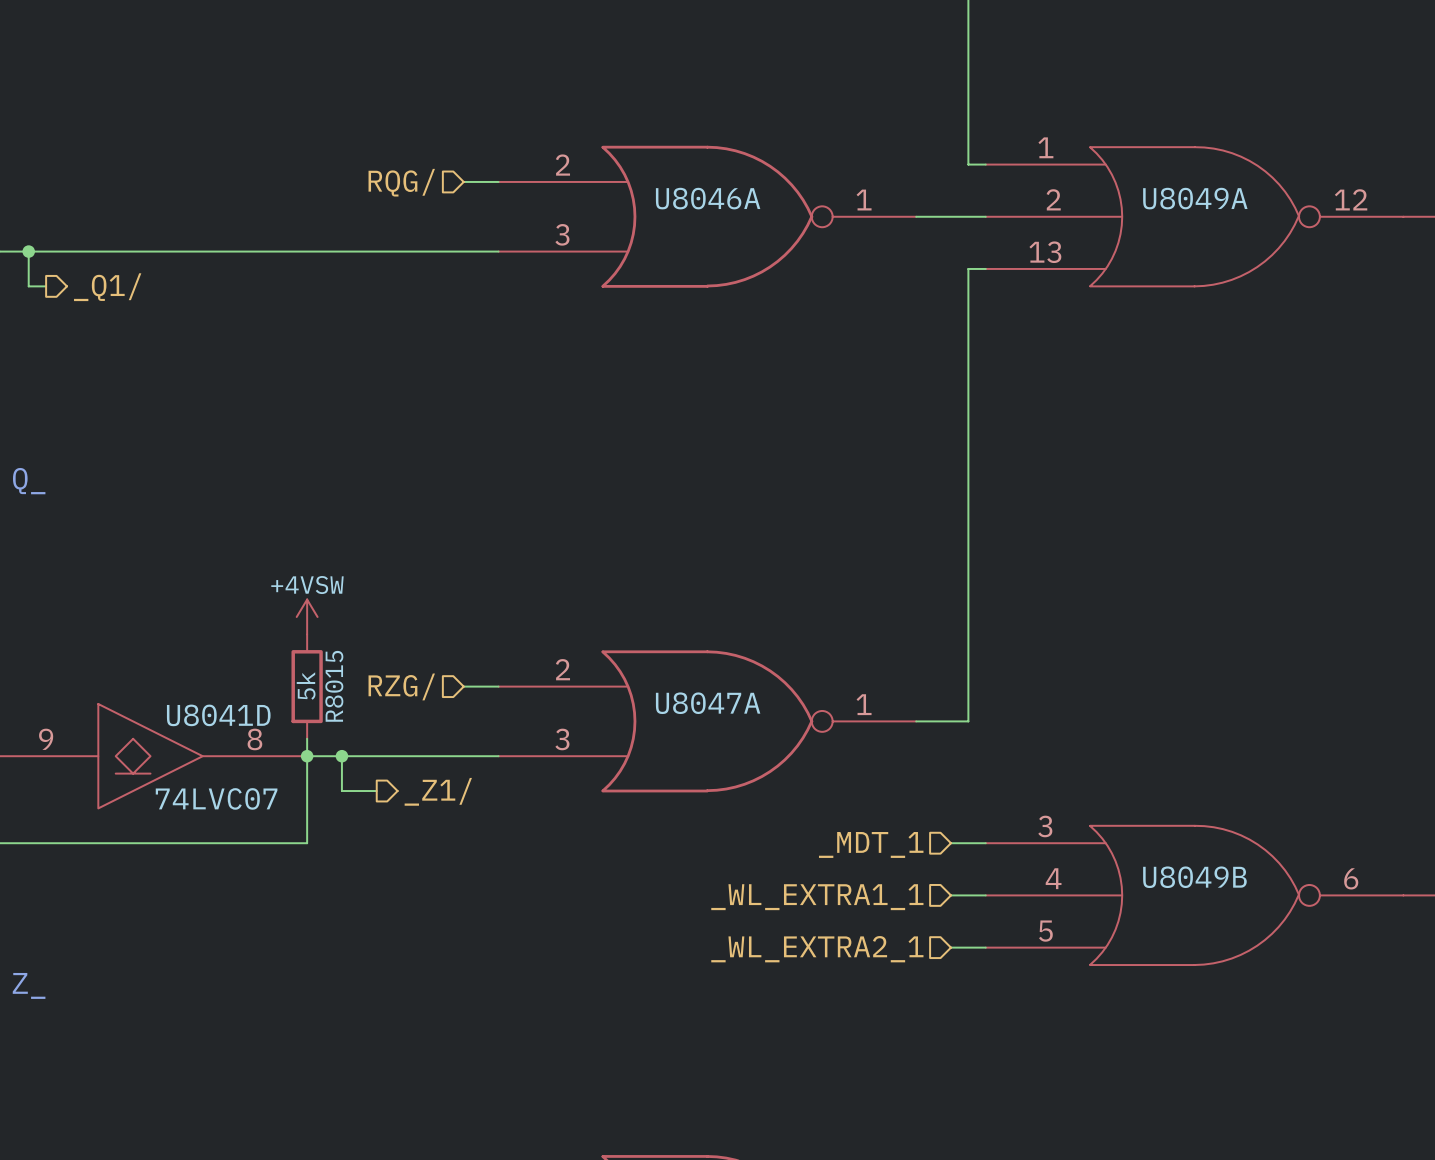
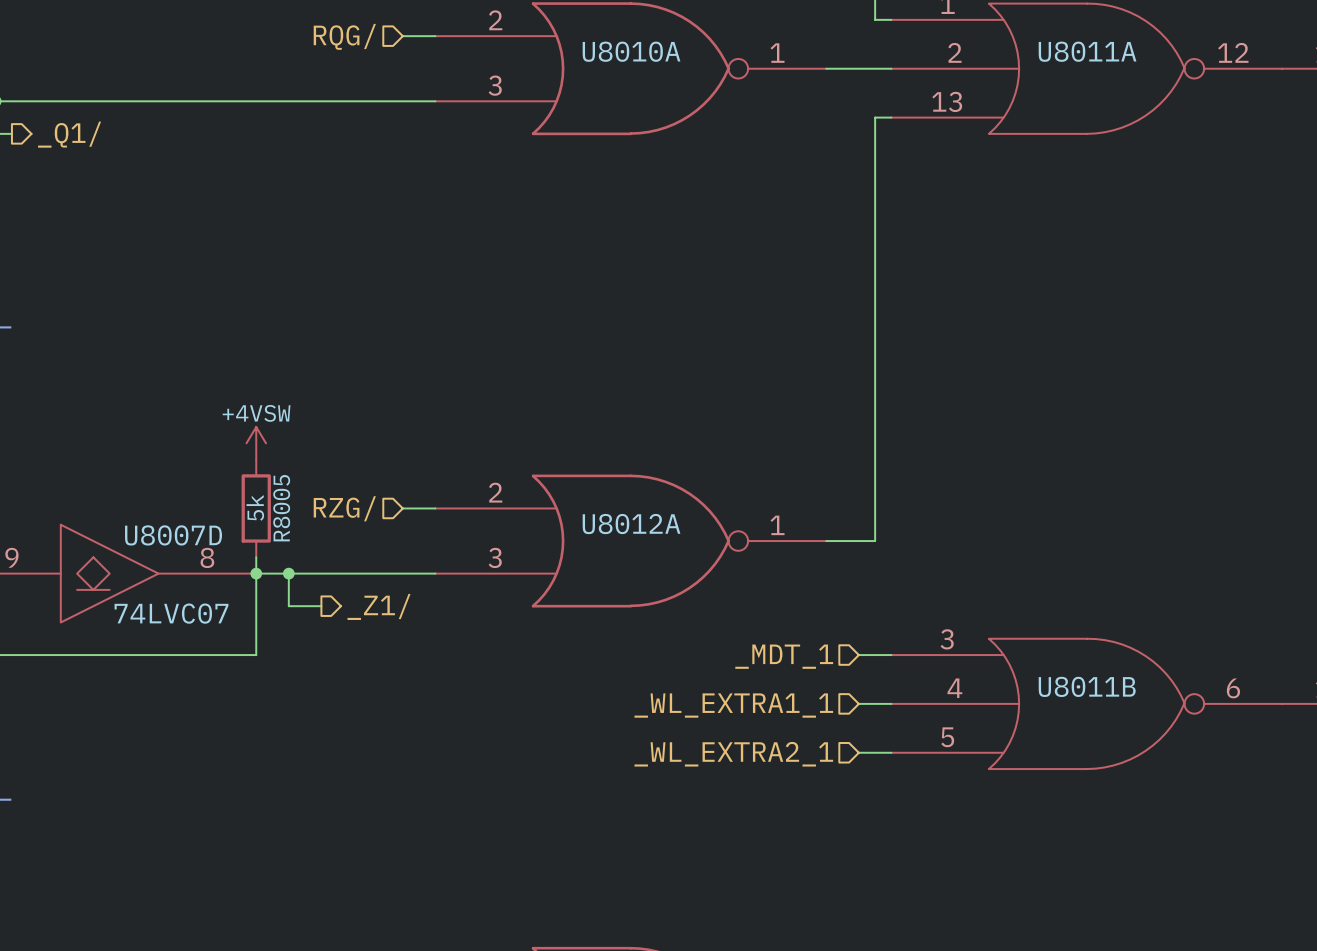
U8046A name: U8046A (708, 198) -> U8010A (631, 51)
U8049A name: U8049A (1195, 198) -> U8011A (1087, 51)
R8015 name: R8015 (334, 686) -> R8005 (281, 508)
U8047A name: U8047A (708, 703) -> U8012A (631, 524)
U8041D name: U8041D (218, 715) -> U8007D (173, 535)
U8049B name: U8049B (1194, 877) -> U8011B (1087, 686)

